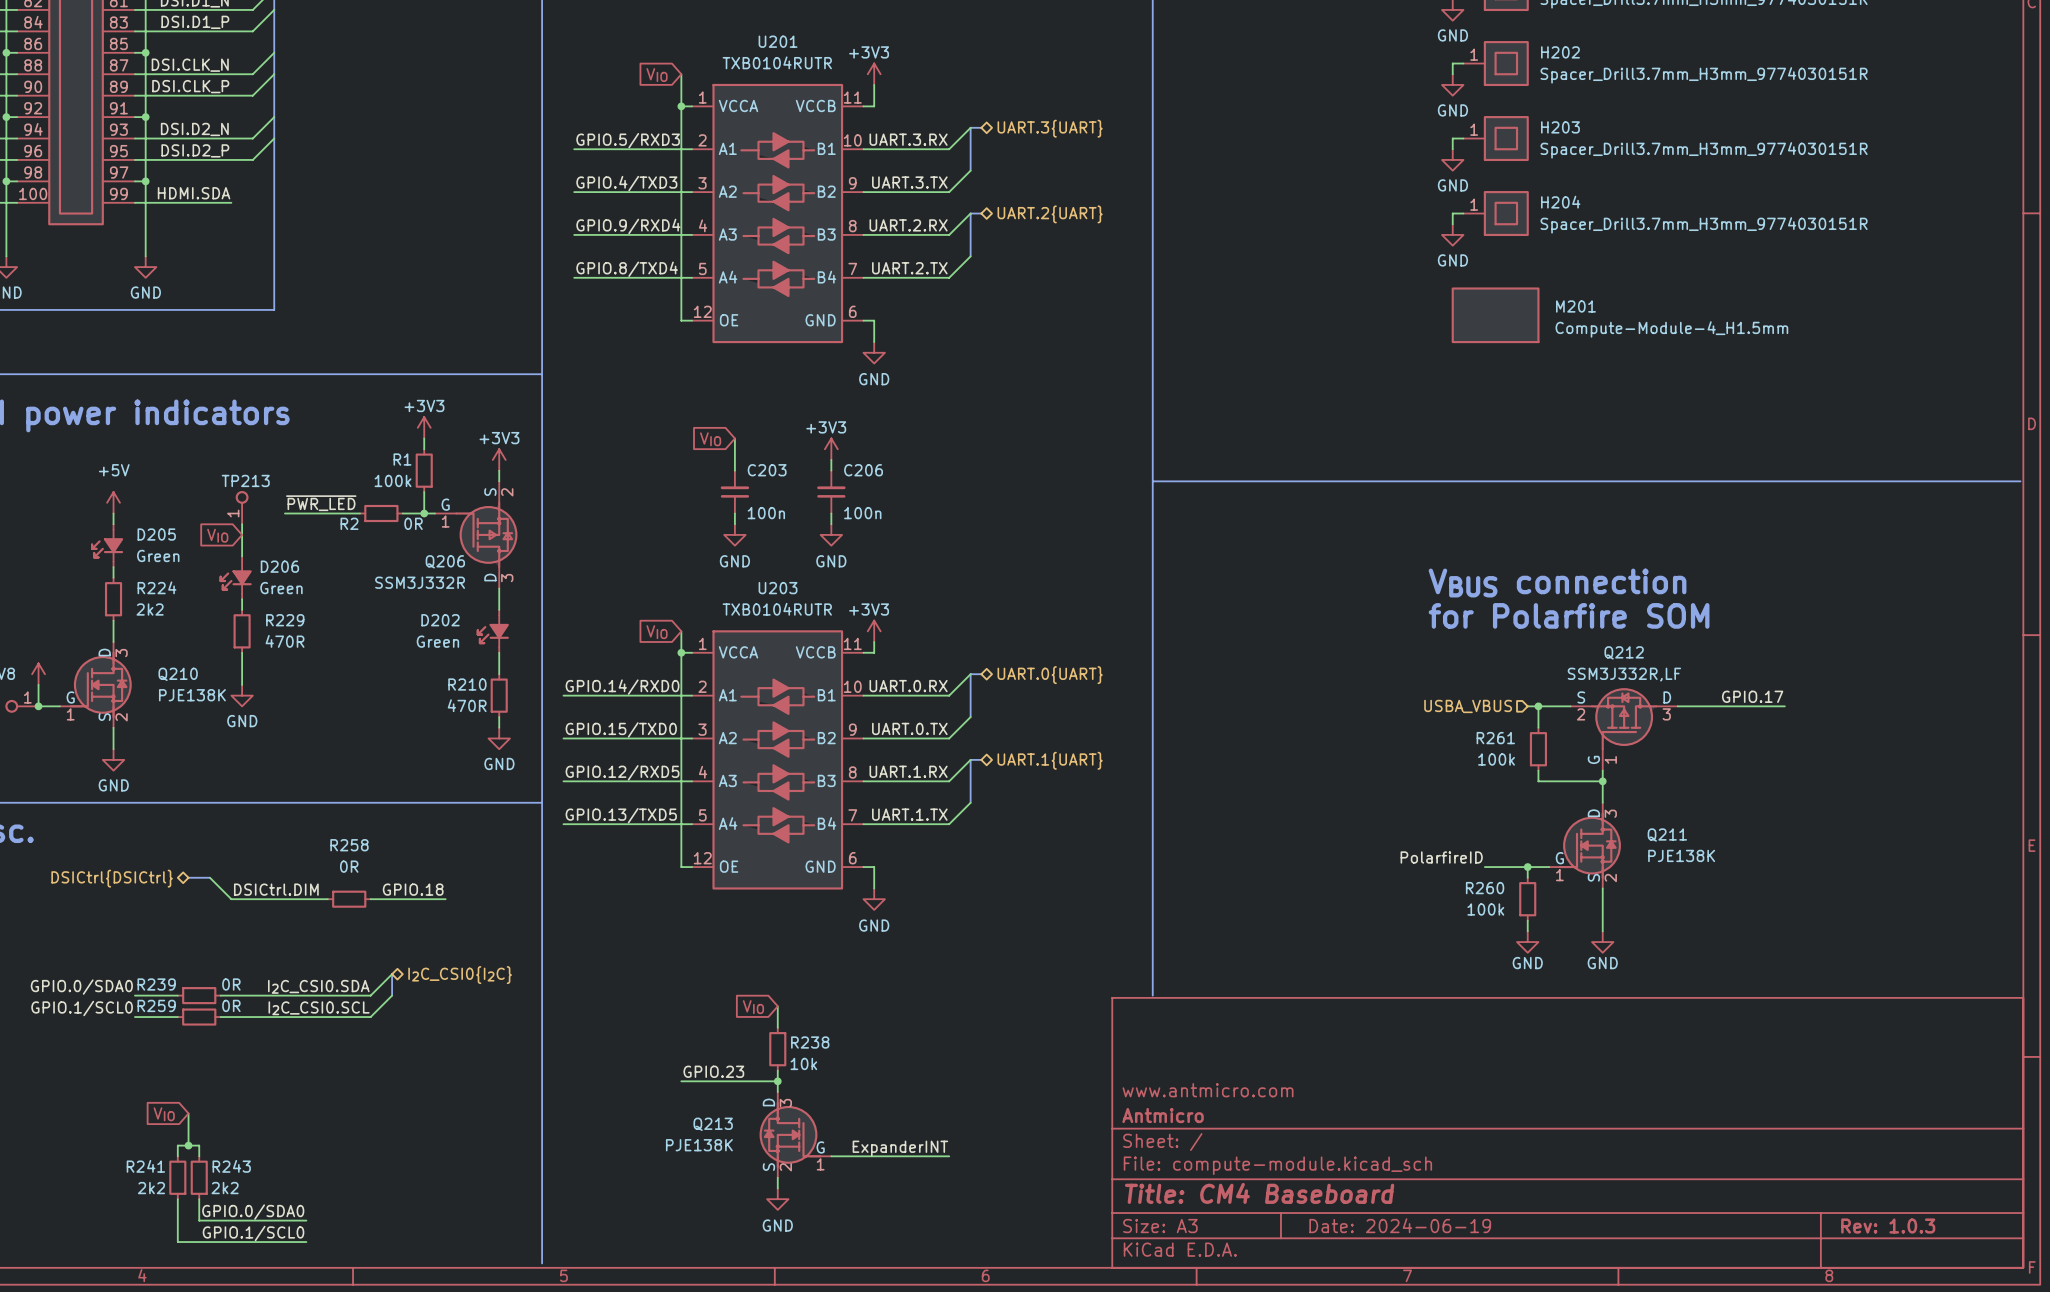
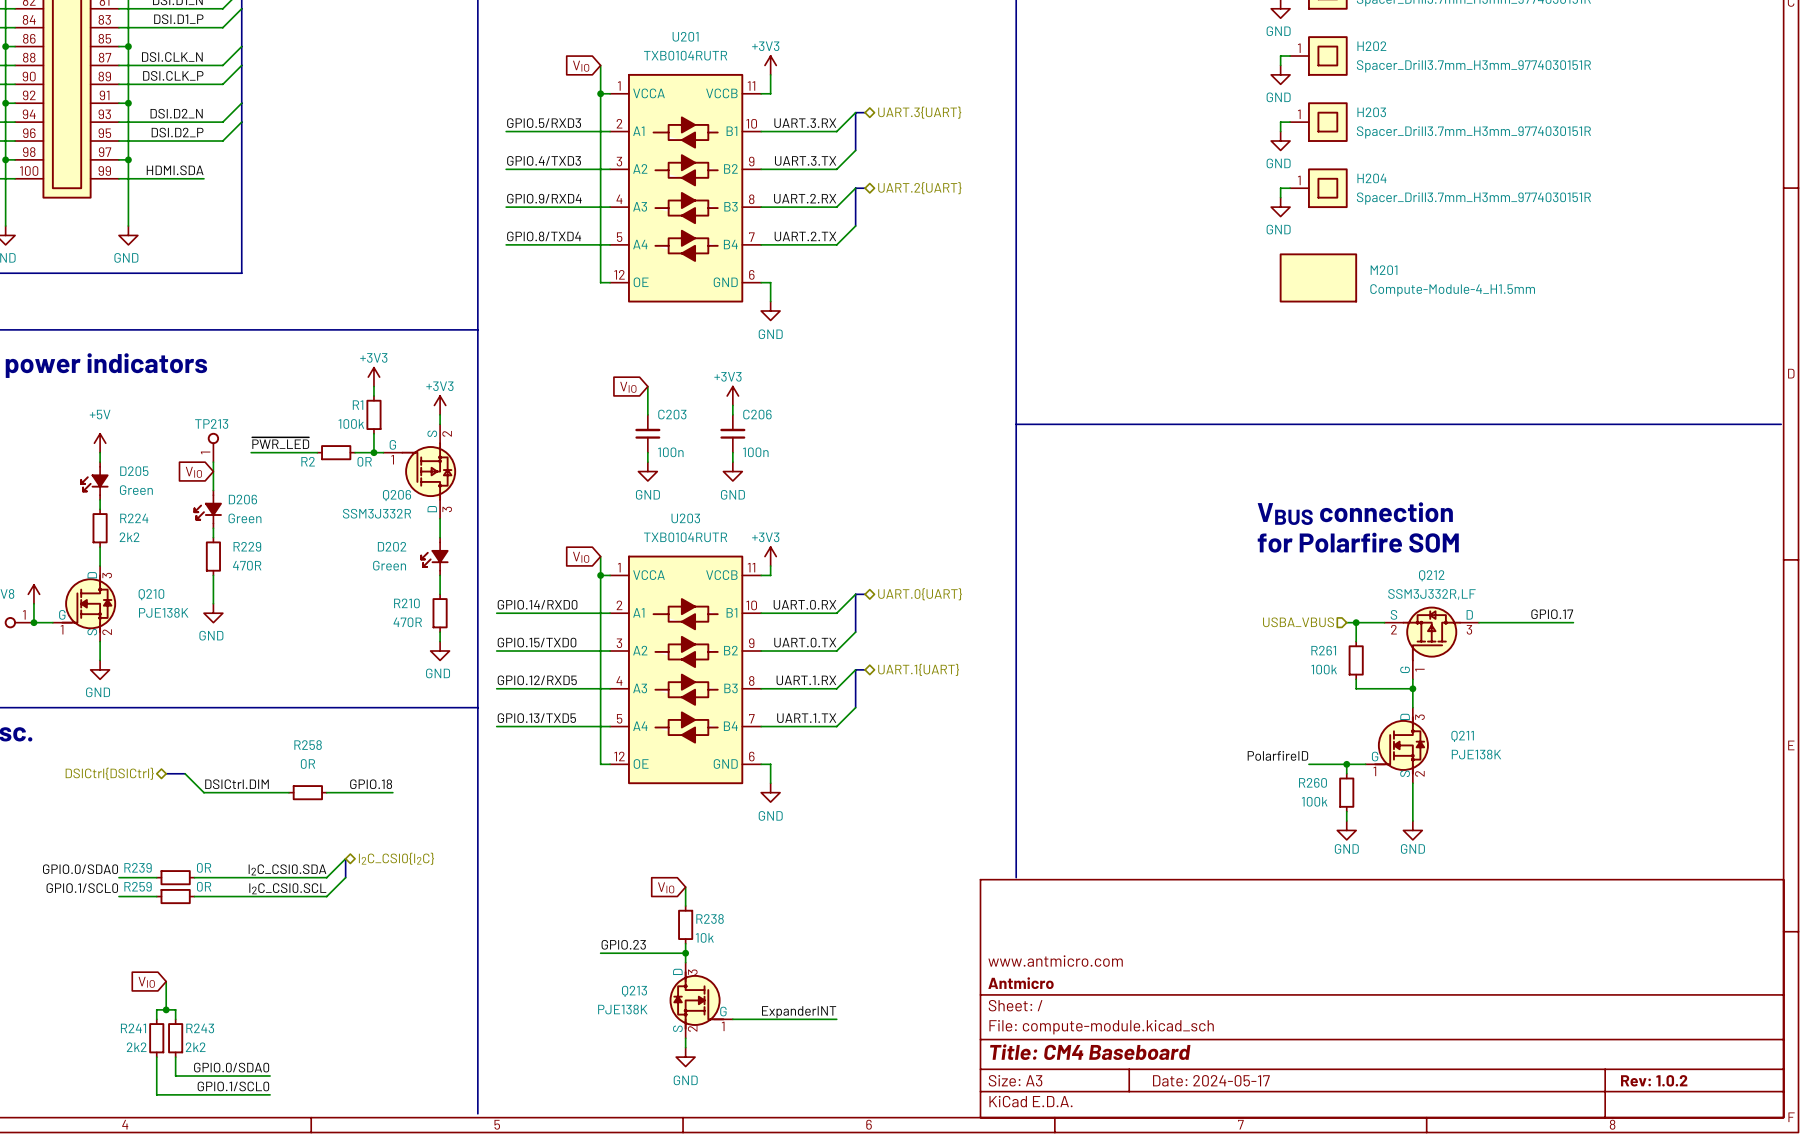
title block: Date: 2024-06-19 (1400, 1225) -> Date: 2024-05-17 (1211, 1080)
title block: Rev: 1.0.3 (1888, 1226) -> Rev: 1.0.2 (1654, 1080)

